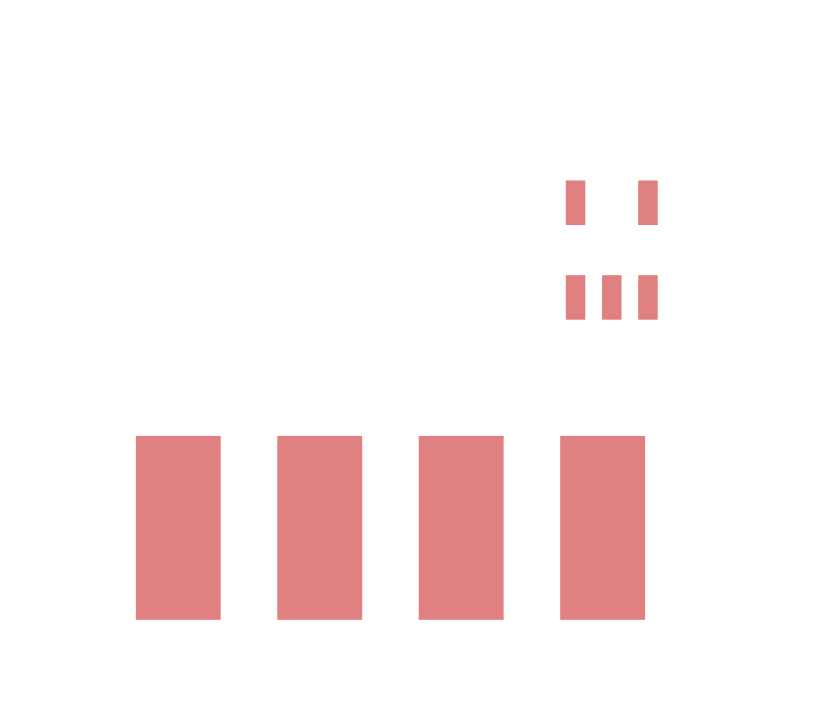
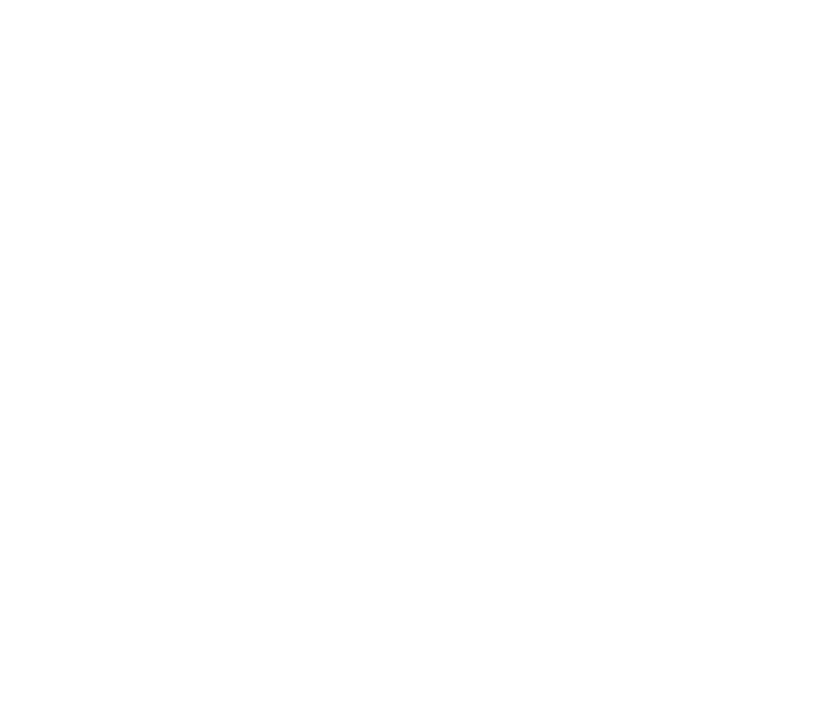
part: (611, 250) -> none
part: (390, 527) -> none

